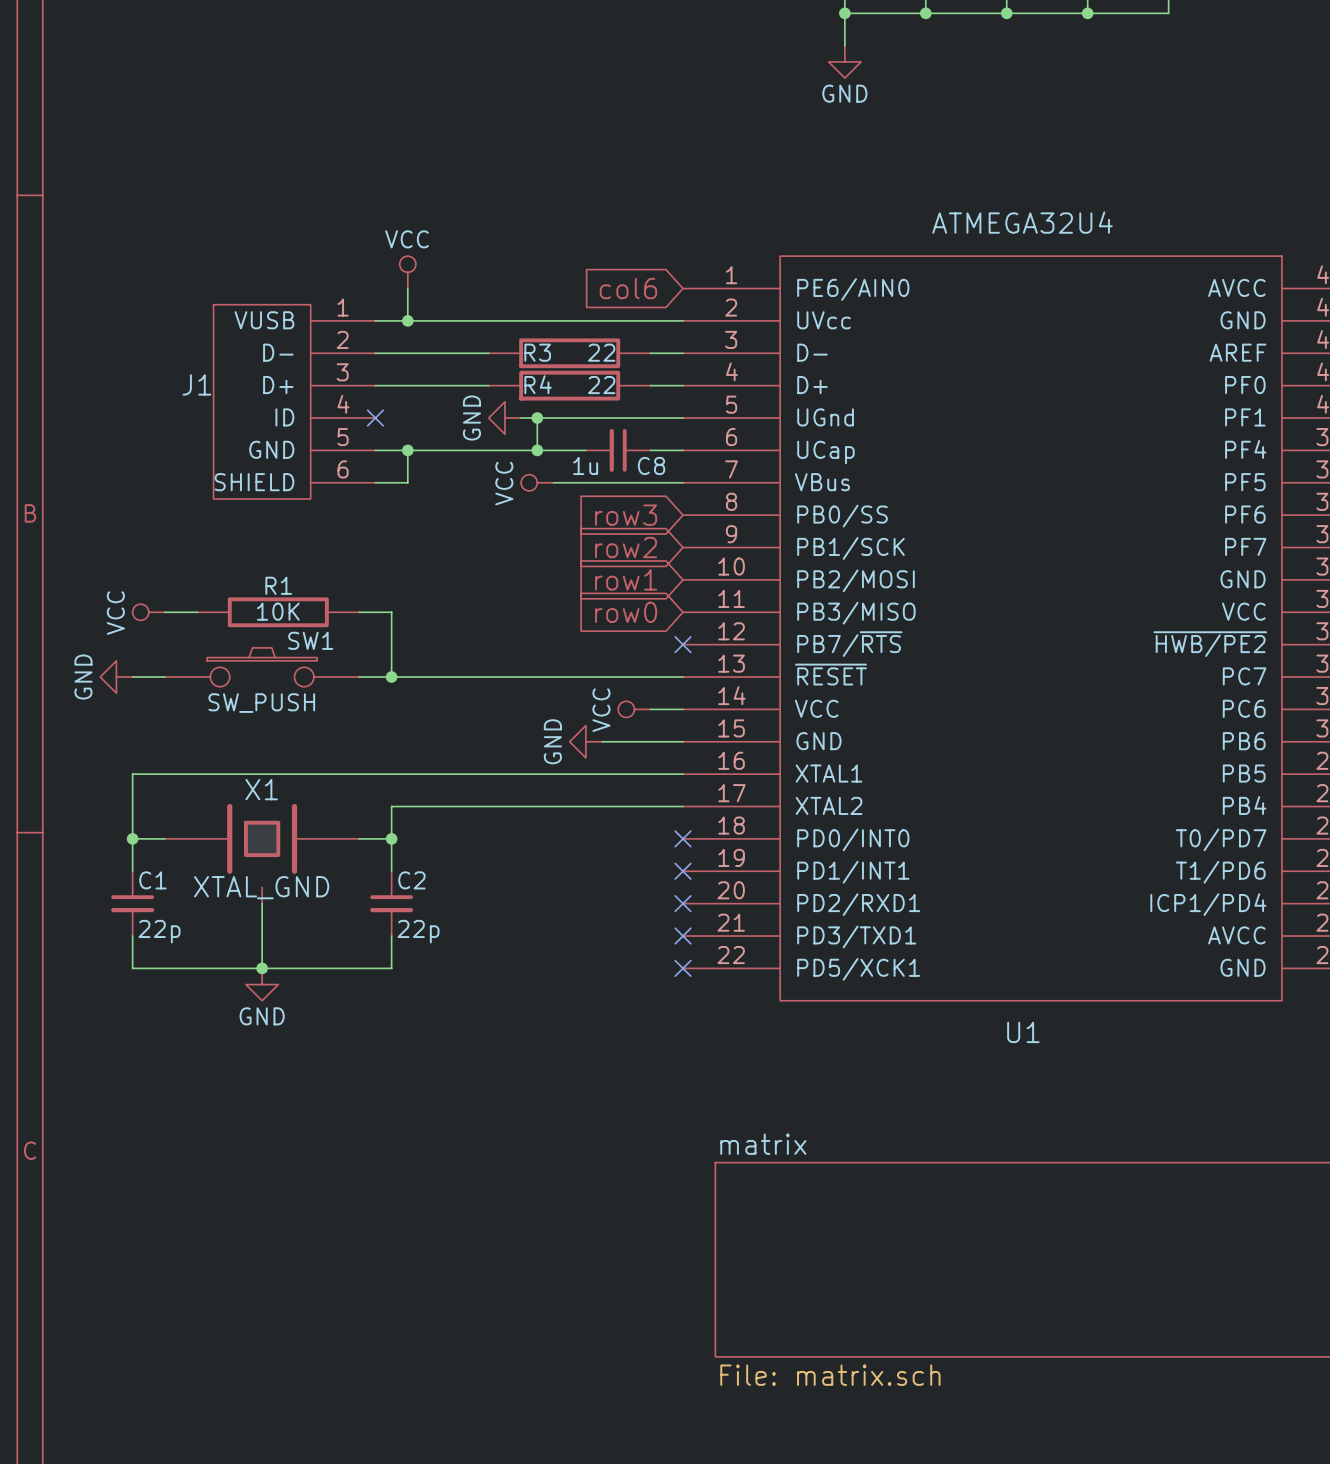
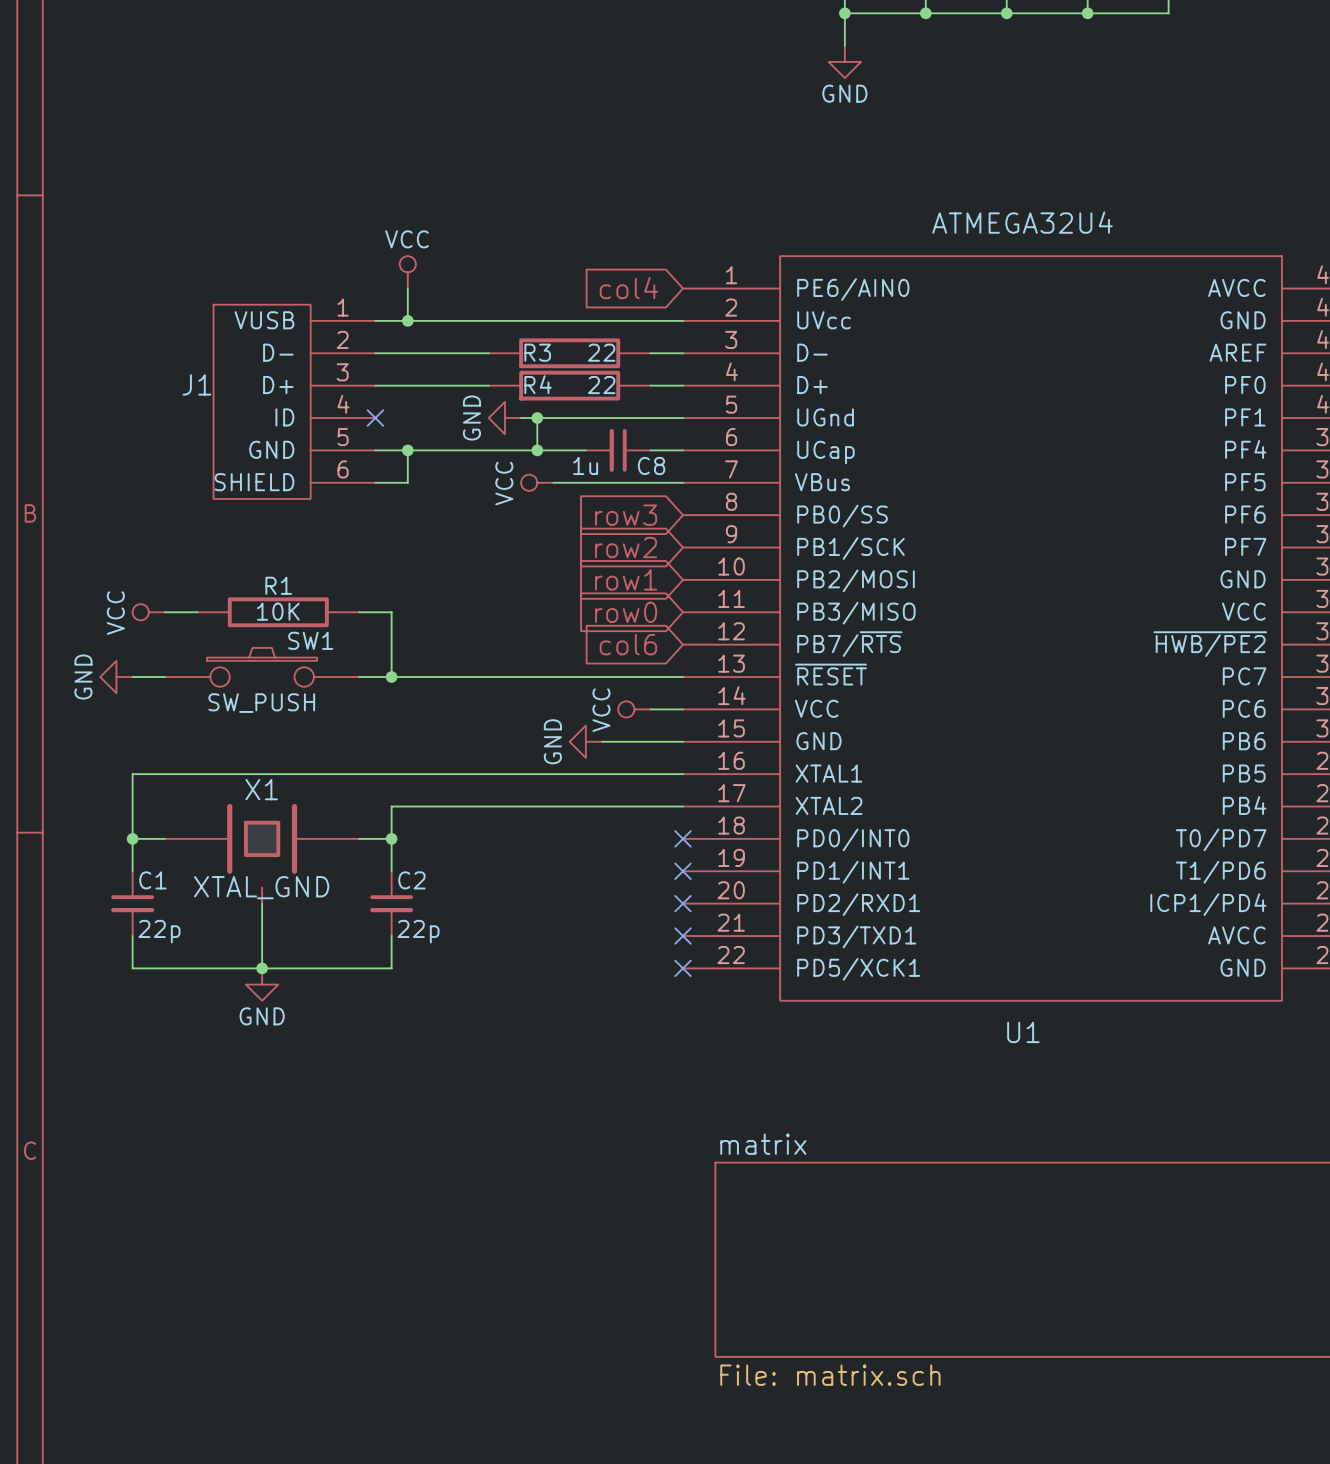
global label: col6 (628, 288) -> col4 (628, 288)
global label: none -> col6 (628, 644)
no-connect mark: (683, 644) -> none

